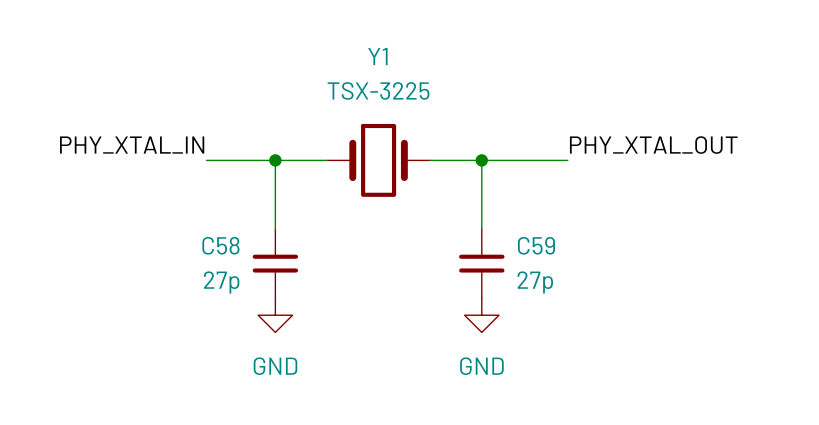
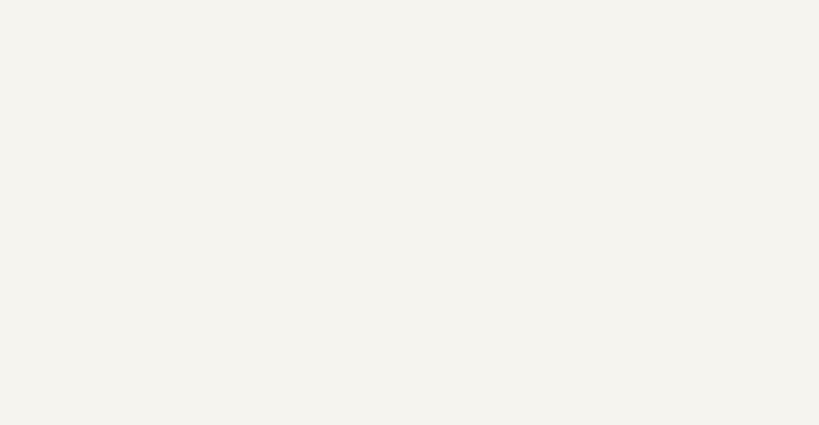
label: PHY_XTAL_IN (132, 145) -> none
label: PHY_XTAL_OUT (653, 145) -> none
wire: (206, 160) (326, 160) -> none
wire: (275, 160) (275, 229) -> none
junction: (275, 160) -> none
Y1: TSX-3225 (378, 160) -> none
wire: (430, 160) (567, 160) -> none
wire: (481, 160) (481, 229) -> none
junction: (481, 160) -> none
C58: 27p (275, 263) -> none
C59: 27p (481, 263) -> none
power symbol: GND (275, 315) -> none
power symbol: GND (481, 315) -> none

